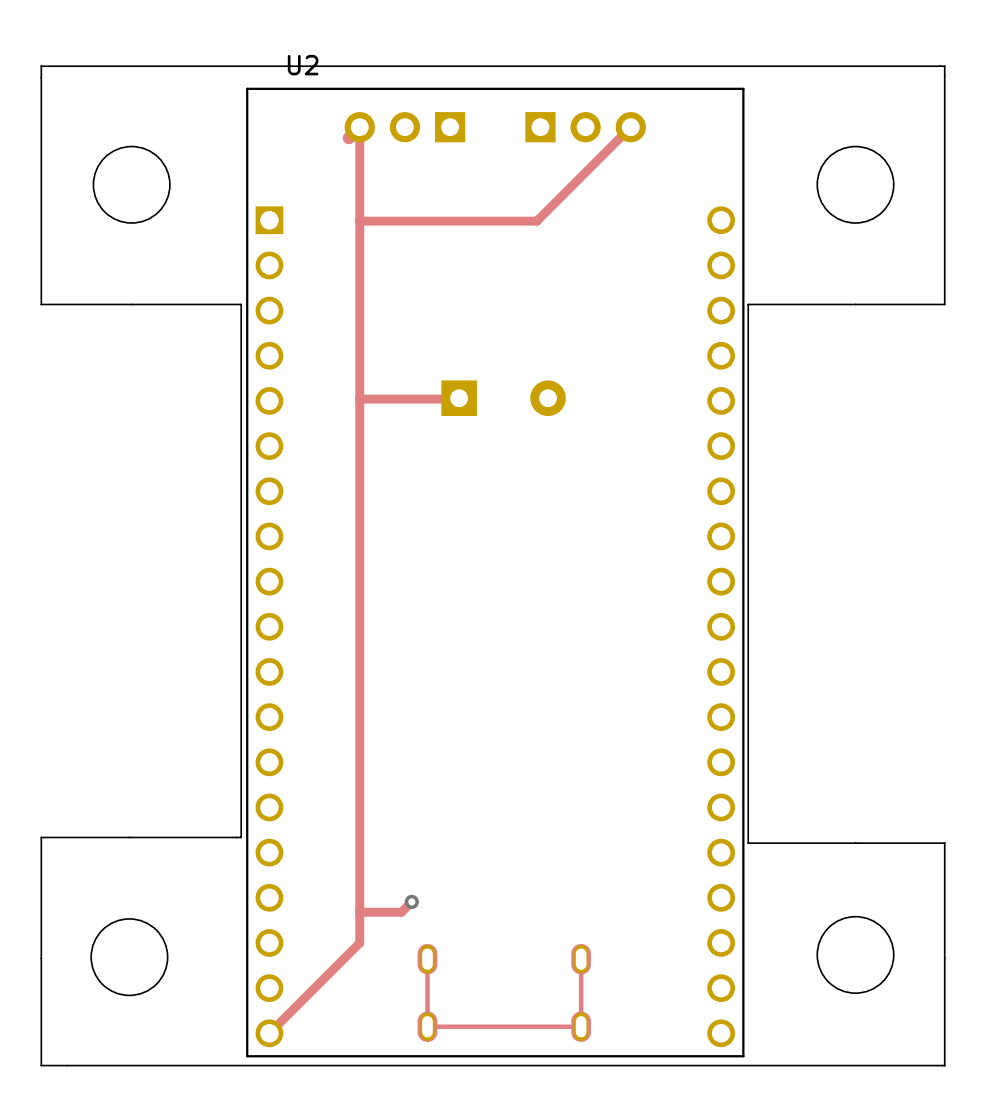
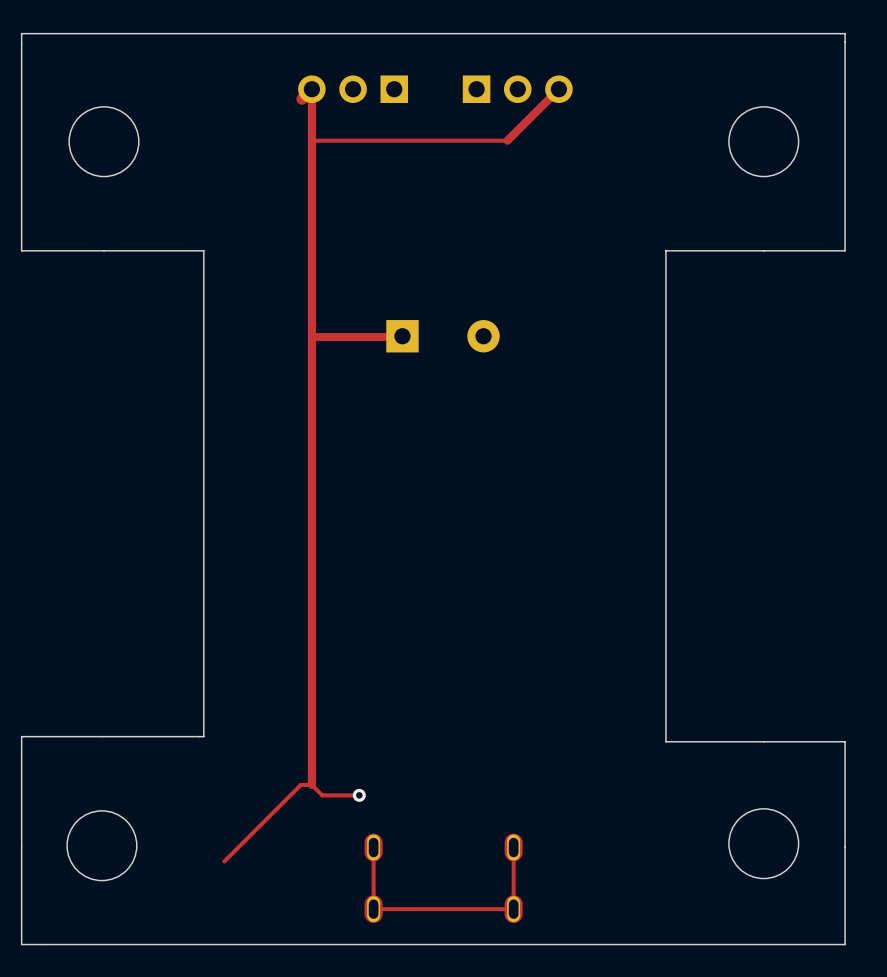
track: (574, 183) (536, 221) (359, 221) -> (507, 140) (311, 140)
U2: (495, 572) -> none
track: (359, 890) (359, 942) (269, 1033) -> none
track: (411, 901) (401, 912) (359, 912) -> (359, 795) (322, 795) (311, 785) (300, 785) (224, 861)

